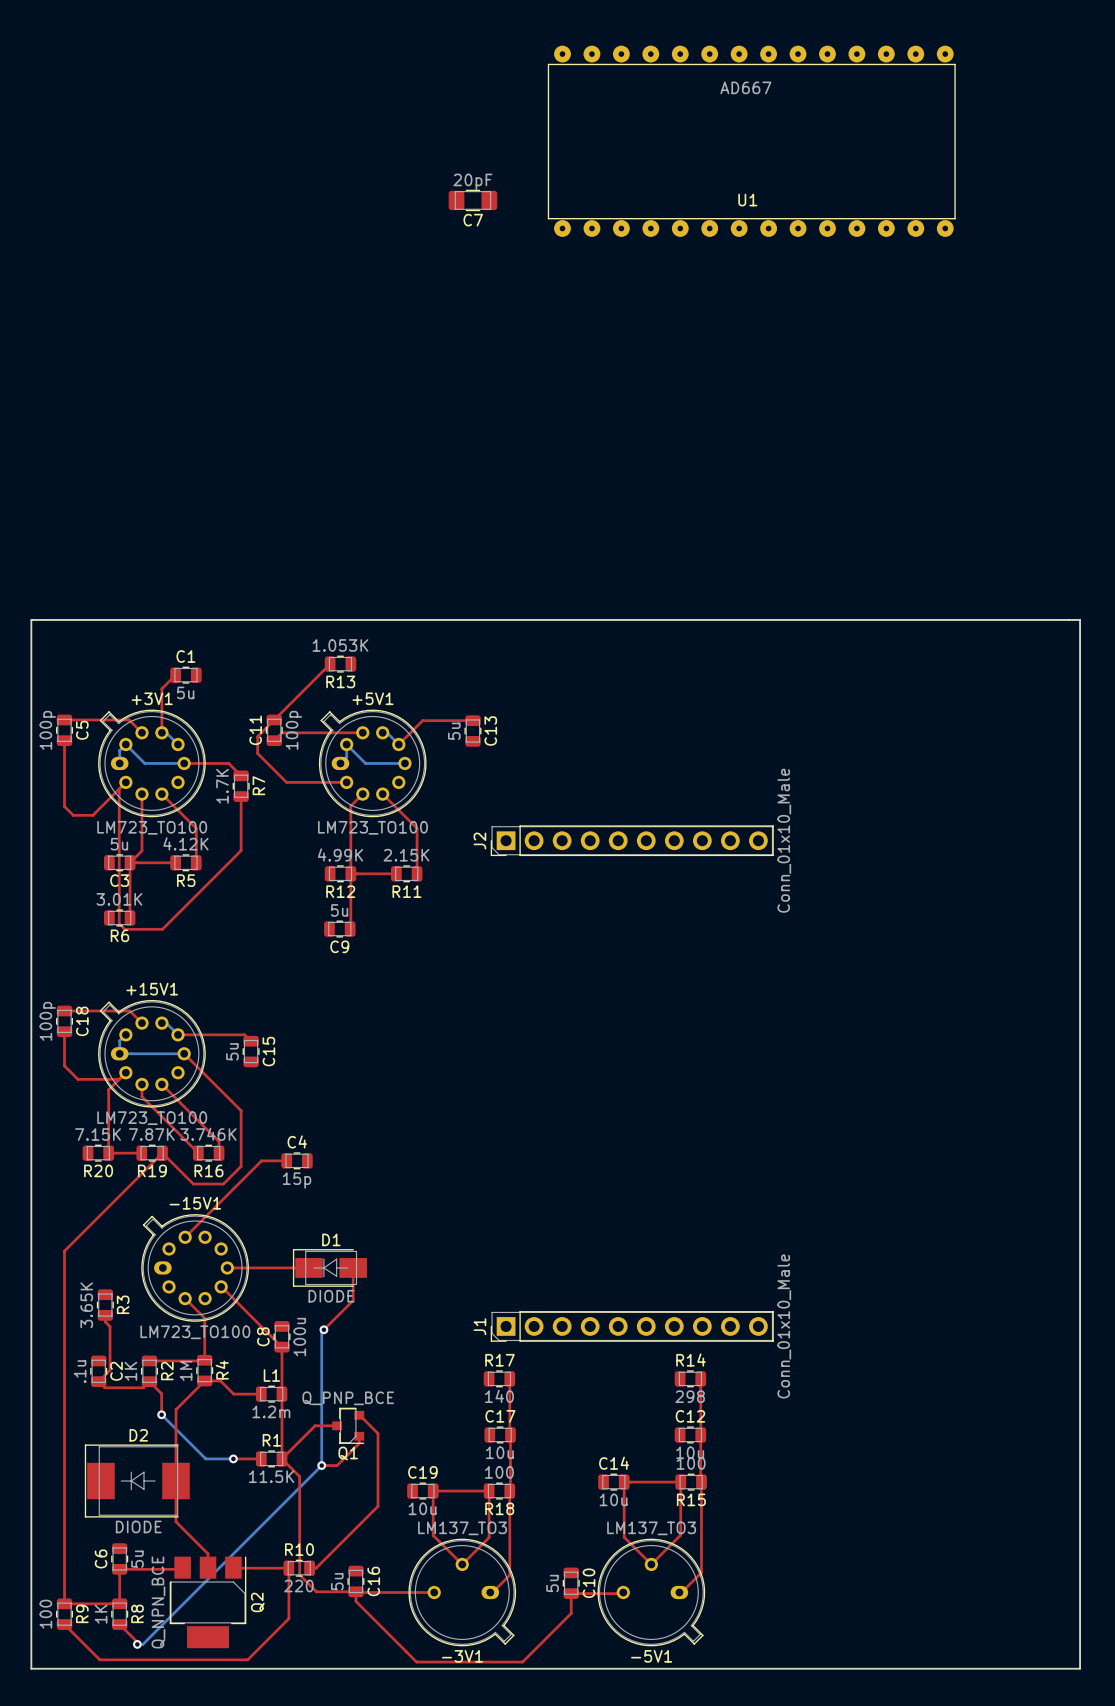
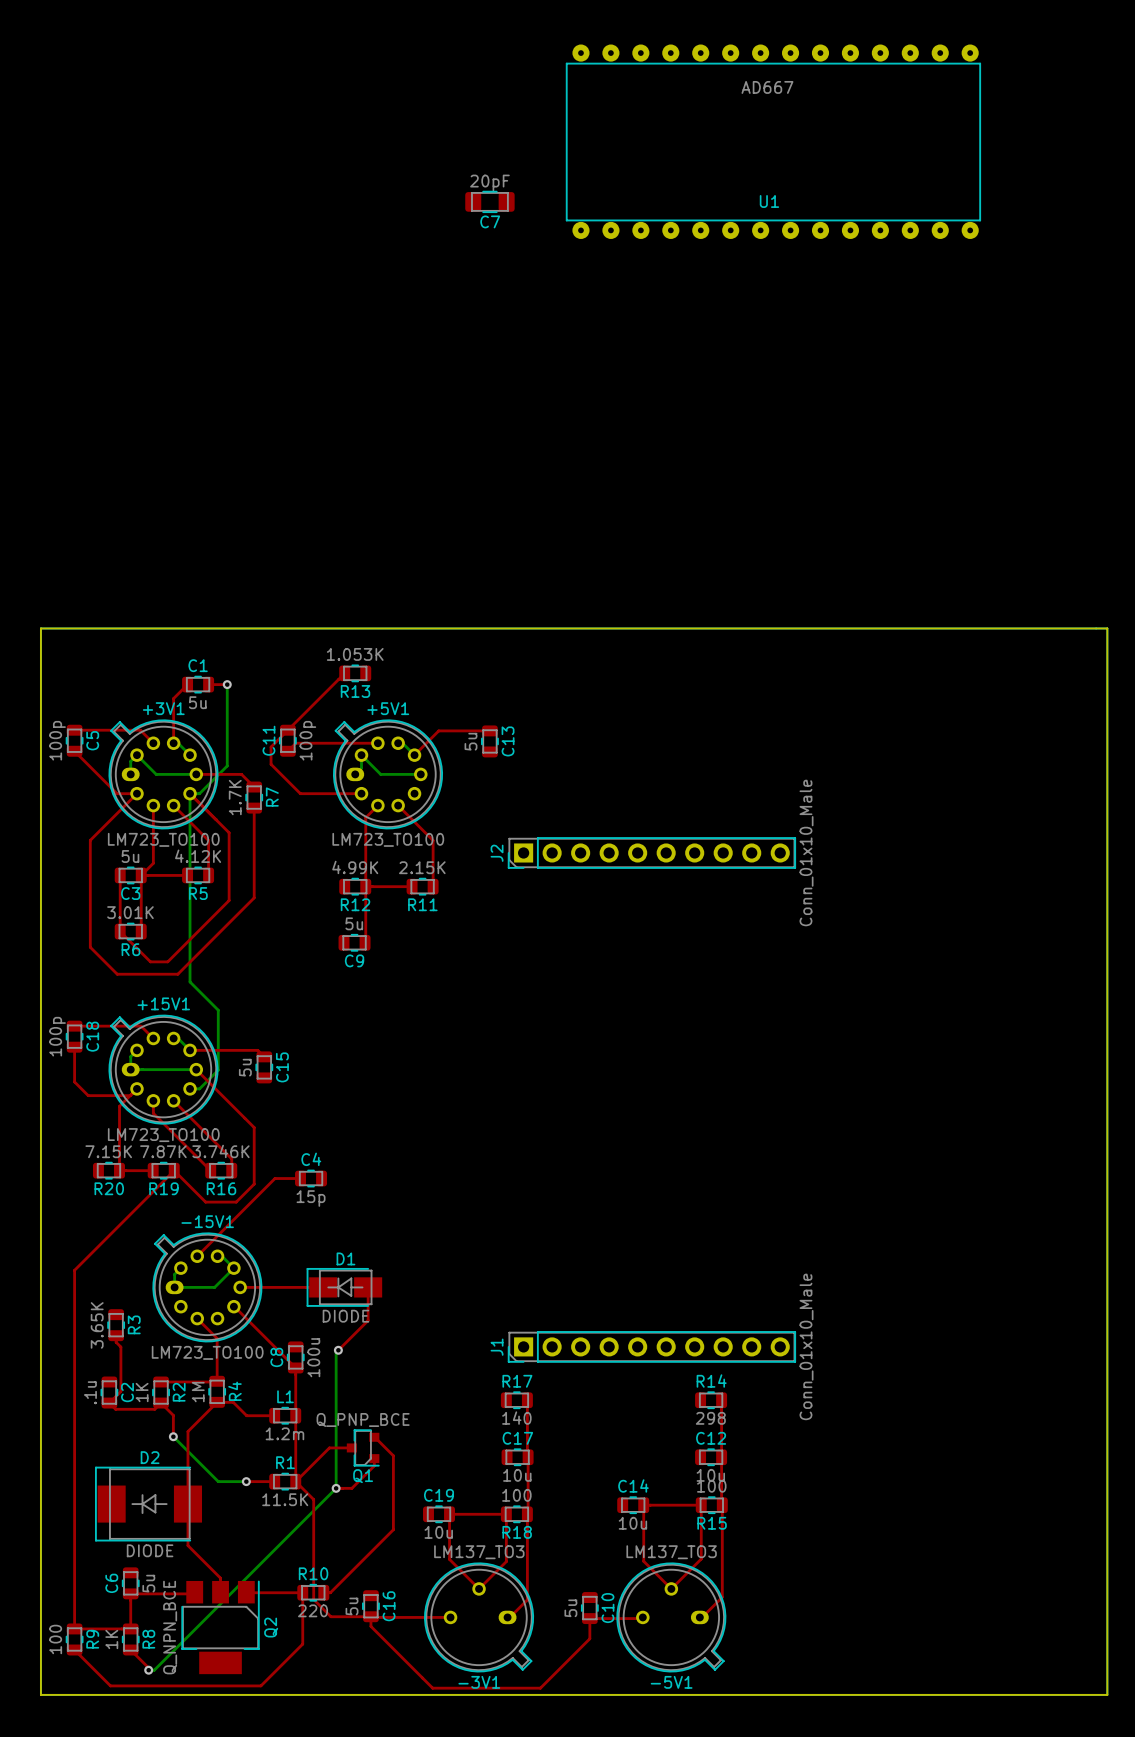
top track: none -> (208, 684) (227, 684)
bottom track: none -> (227, 684) (227, 765) (199, 793) (190, 793) (190, 981) (218, 1010) (218, 1070) (199, 1088) (190, 1088)
via: none -> (227, 684)
top track: (64, 740) (64, 806) (73, 815) (92, 815) -> (74, 751) (117, 793) (136, 793)
top track: none -> (190, 793) (229, 832) (229, 900) (167, 961) (150, 961) (120, 931) (120, 875)
top track: (119, 789) (119, 923) (124, 929) (162, 929) (241, 850) -> (103, 827) (90, 840) (90, 947) (117, 974) (177, 974) (254, 897) (254, 863)
bottom track: none -> (217, 1256) (222, 1256) (233, 1268) (214, 1287) (174, 1287) (174, 1274) (180, 1268)

